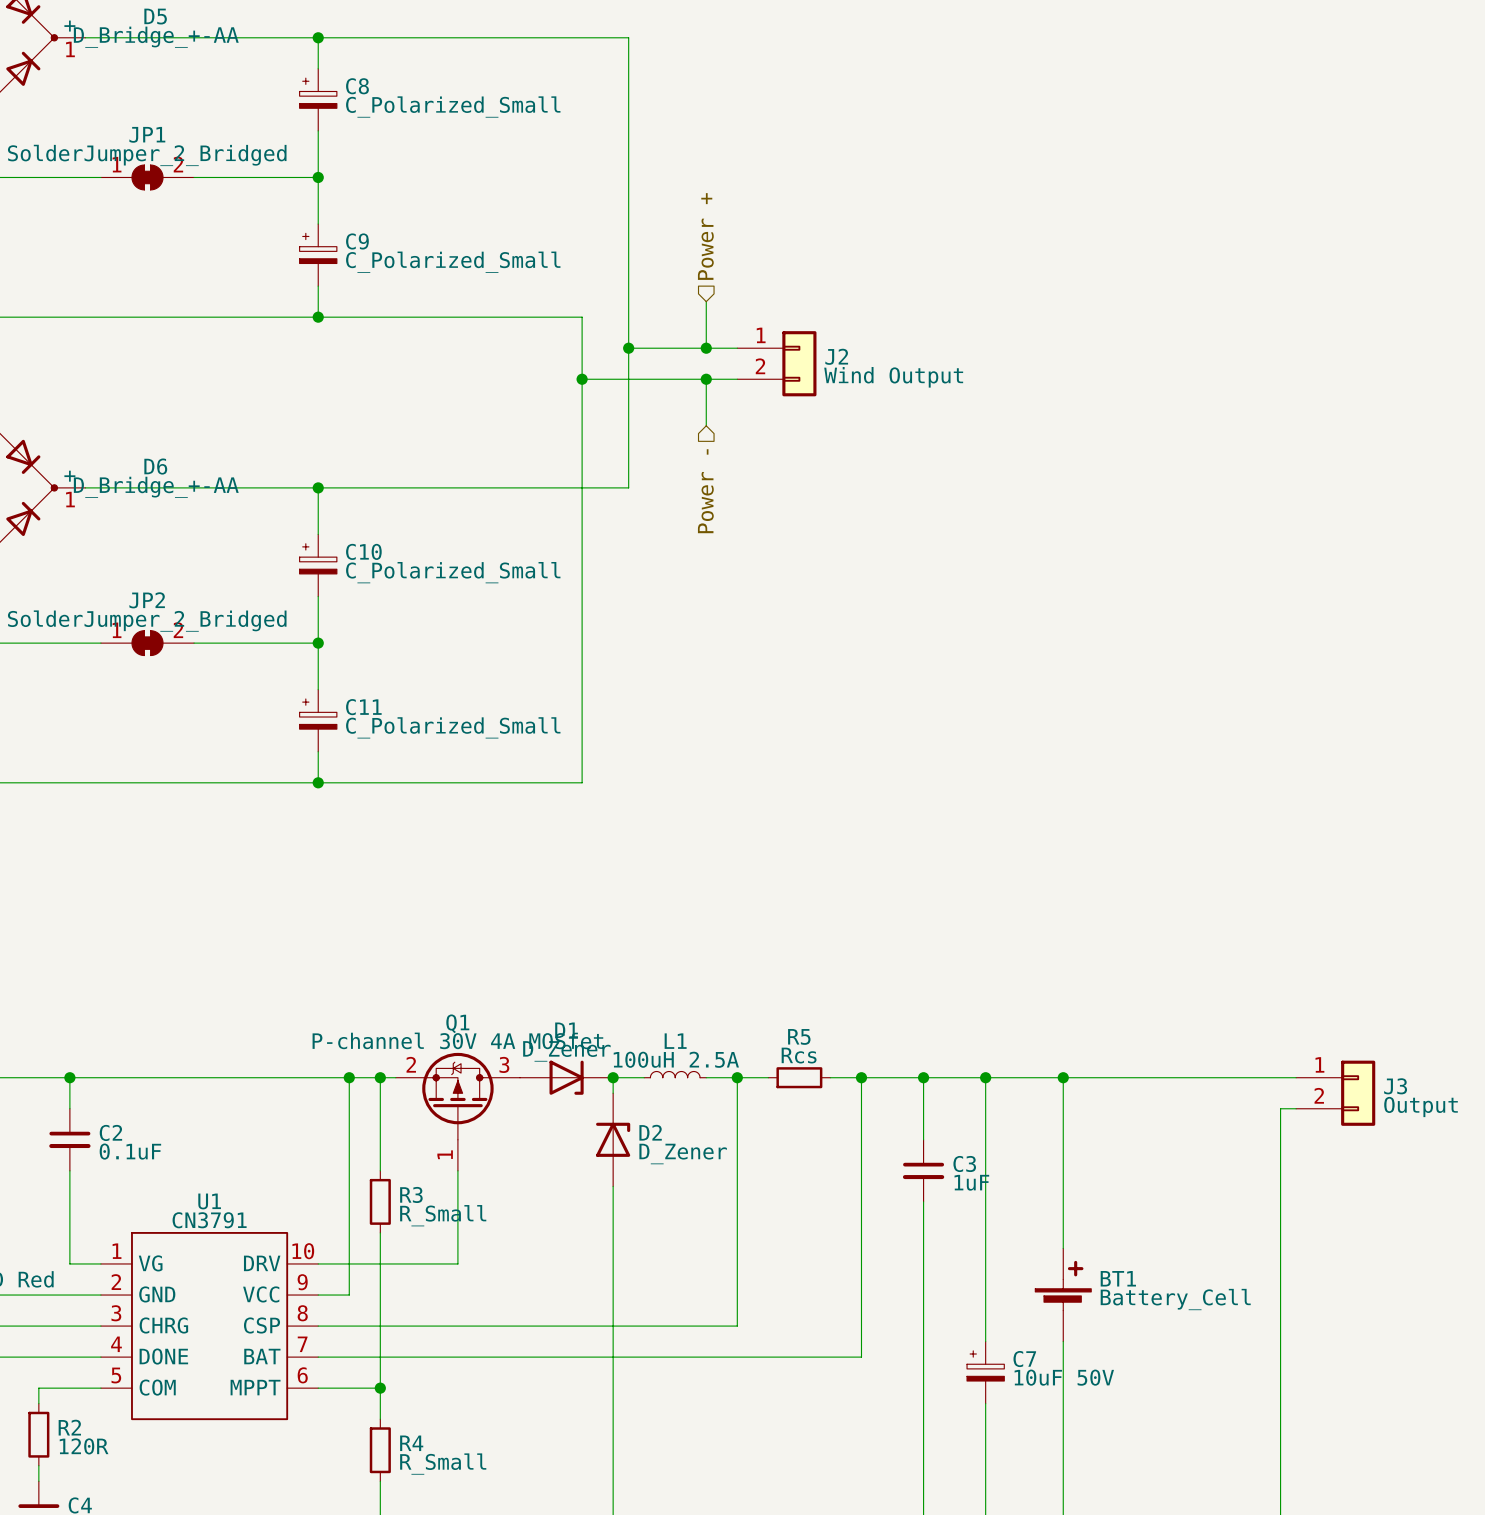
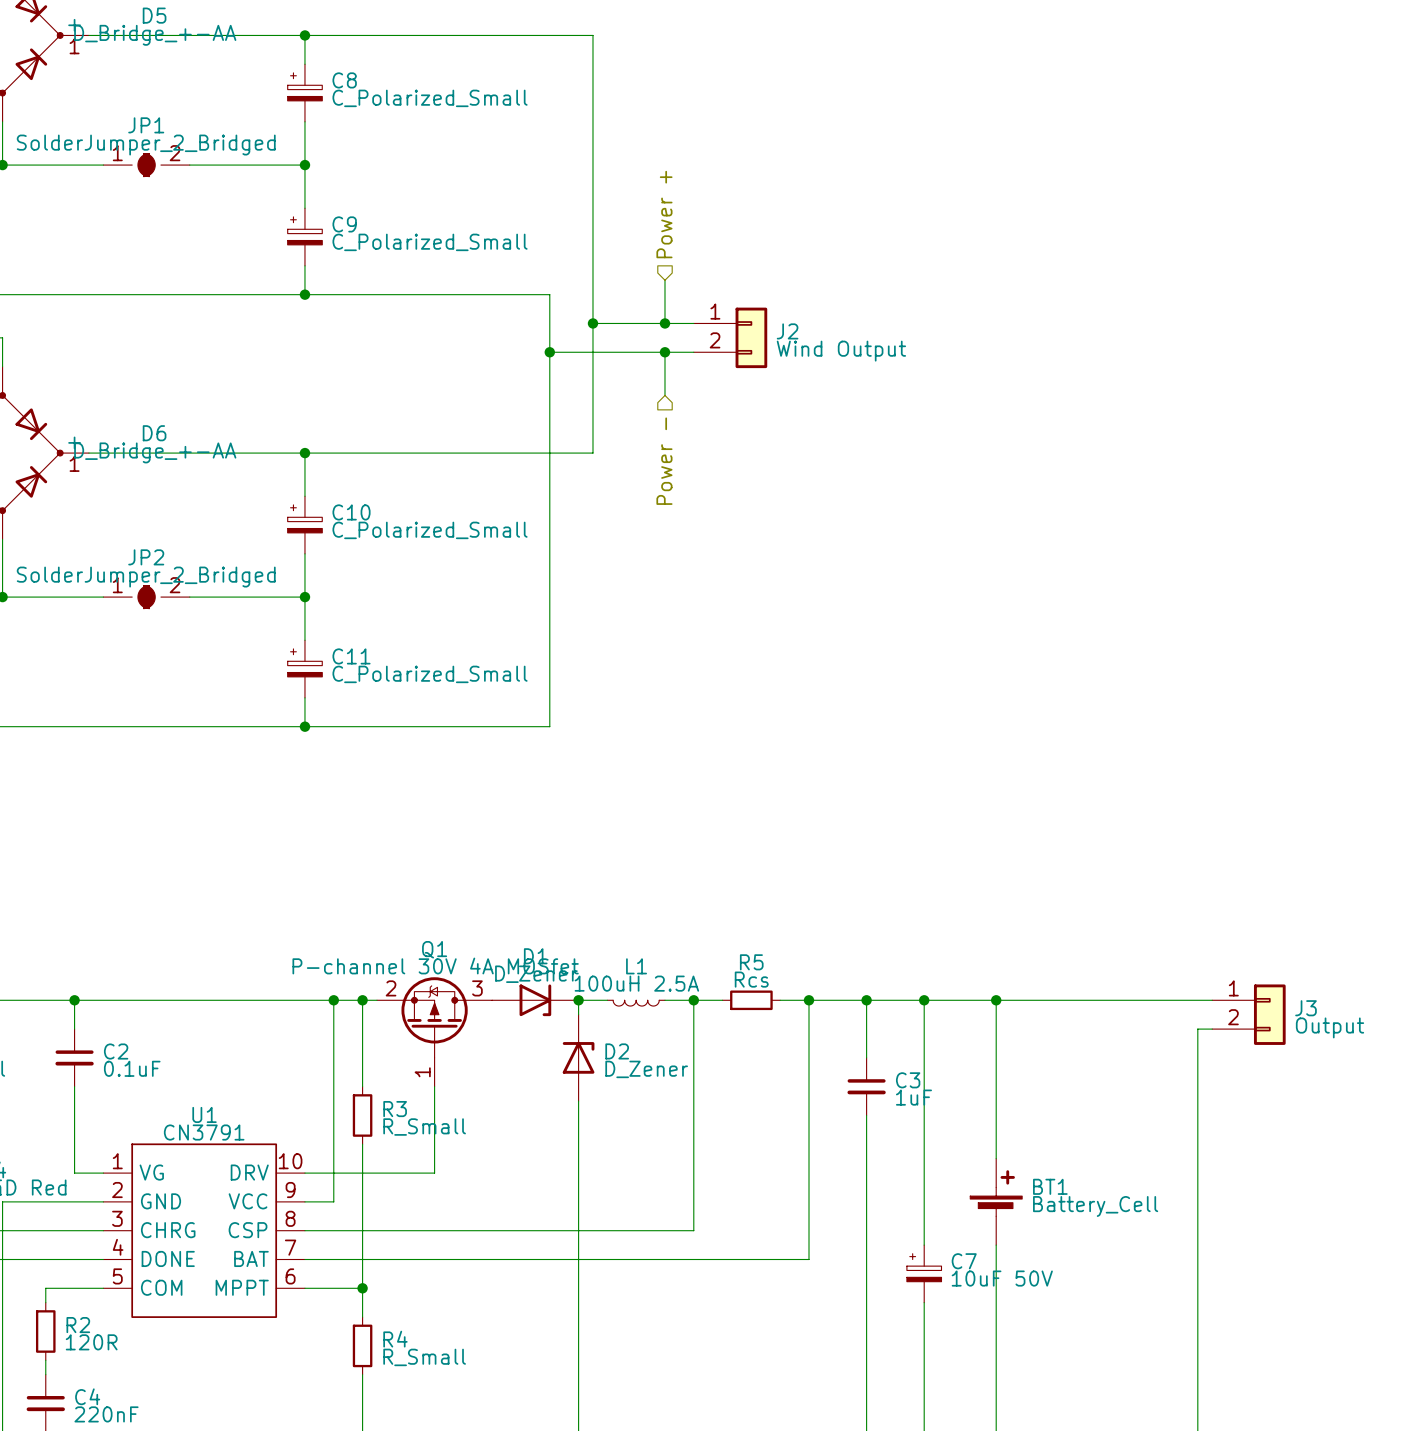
JP1 symbol: [100, 165, 195, 190] -> [103, 153, 190, 177]
JP2 symbol: [100, 630, 195, 656] -> [103, 585, 190, 609]
L1 rotation: 0° (675, 1074) -> 180° (636, 1003)

